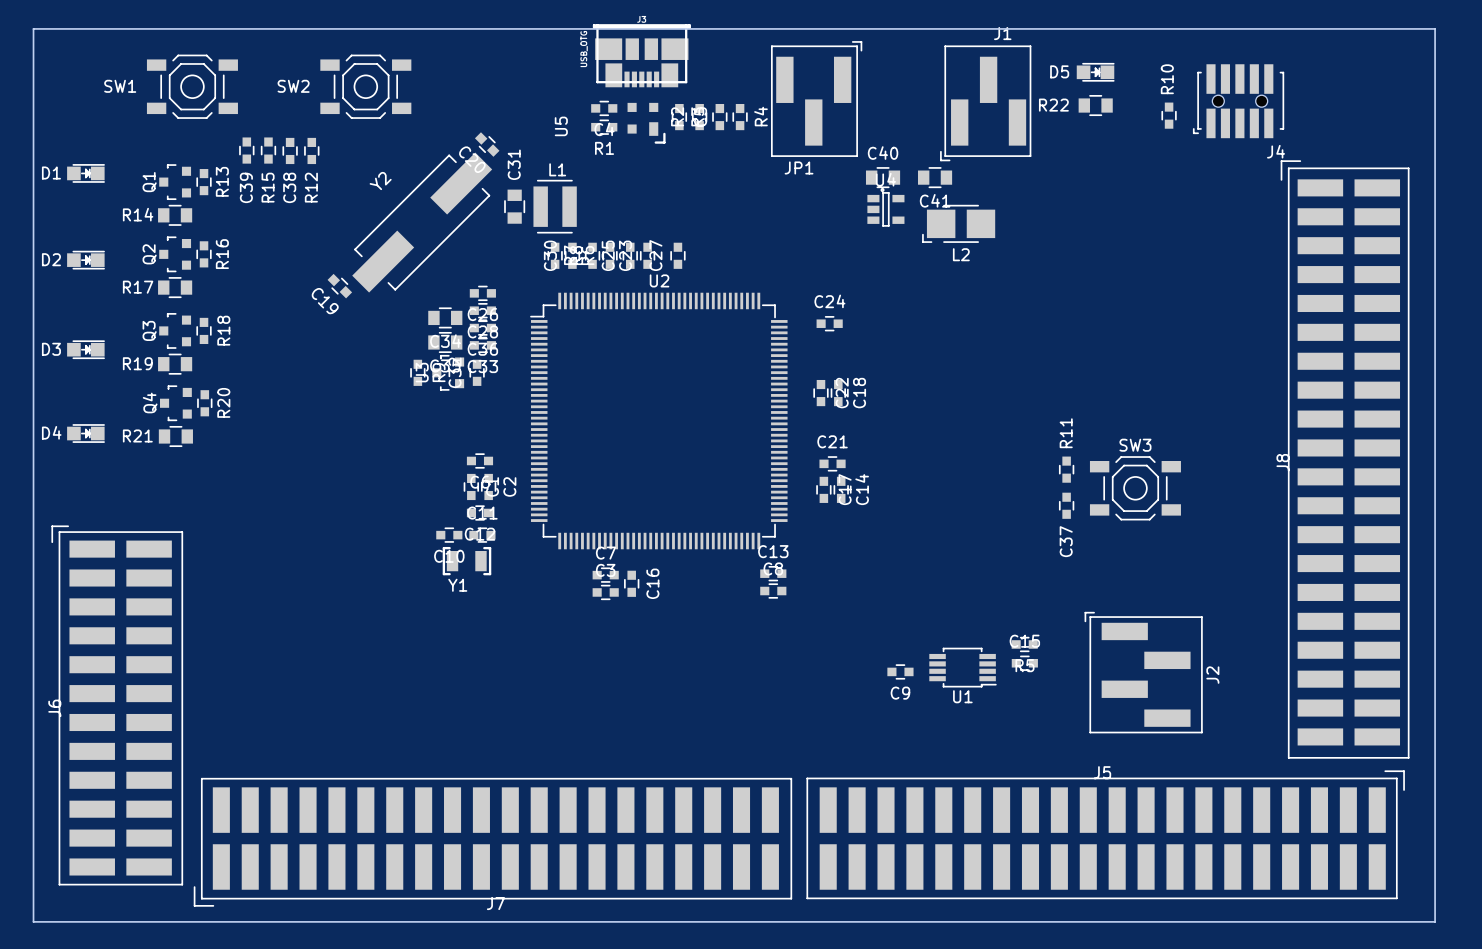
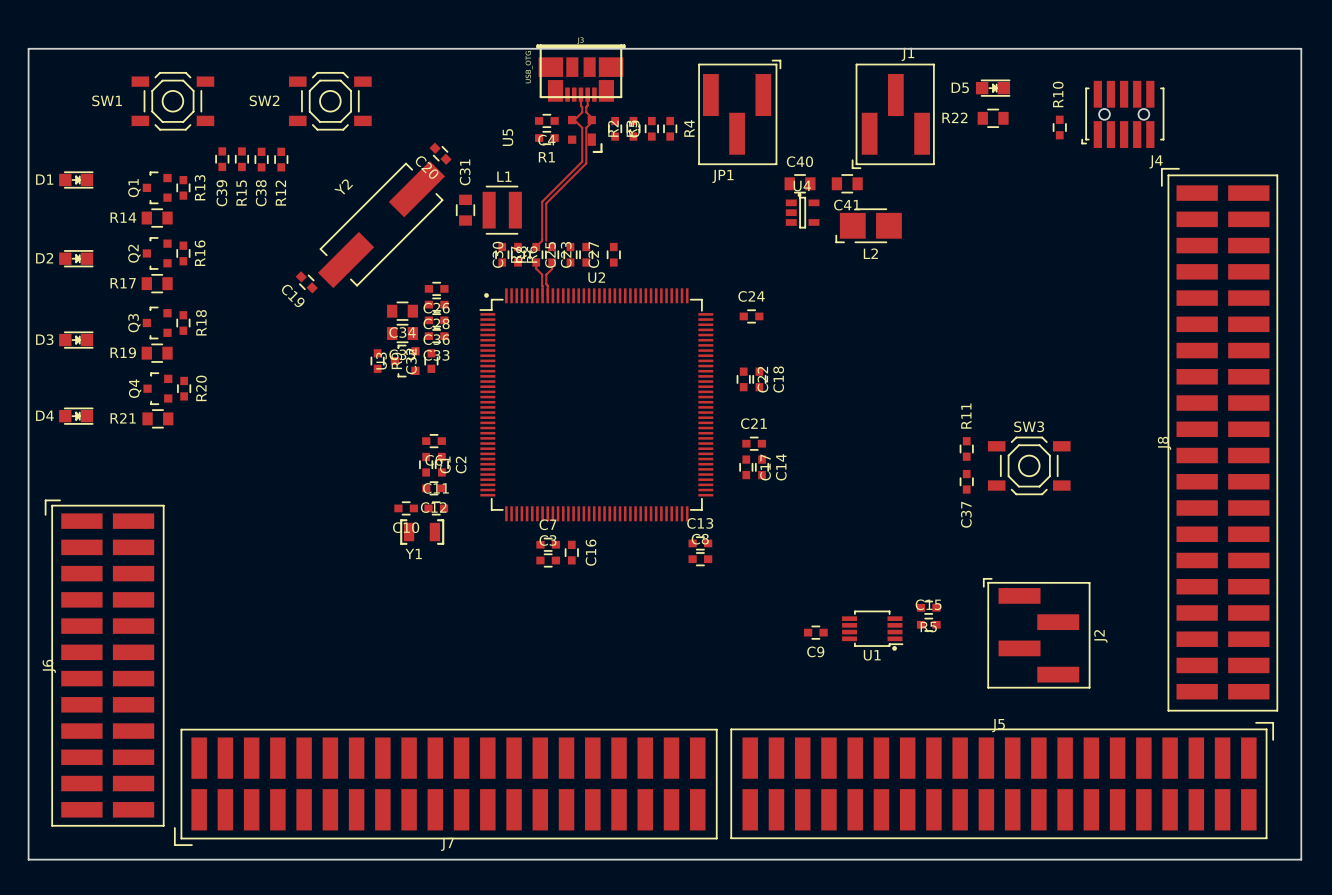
track: none -> (580, 94) (582, 112) (574, 120) (582, 127) (582, 161) (542, 201) (542, 240) (536, 247)
track: none -> (587, 94) (586, 112) (594, 120) (586, 127) (586, 163) (546, 203) (546, 240)
track: none -> (536, 262) (536, 268) (542, 274) (542, 295)
track: none -> (552, 262) (552, 268) (546, 274) (547, 295)
drawing: none -> [484, 293, 489, 298]
drawing: none -> [892, 646, 897, 651]

